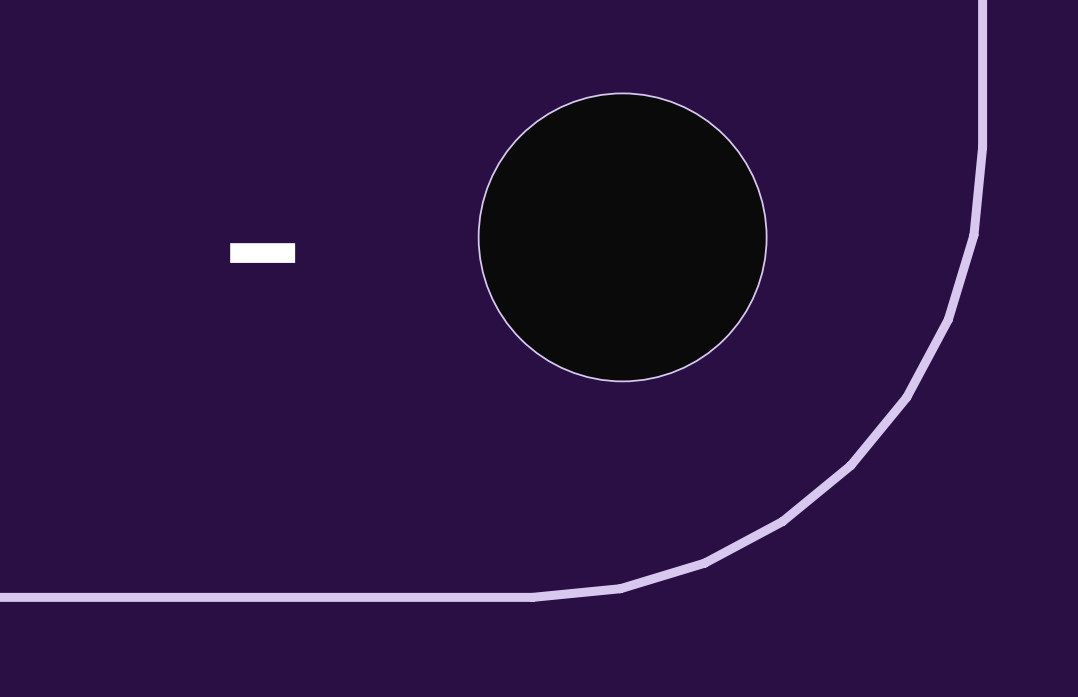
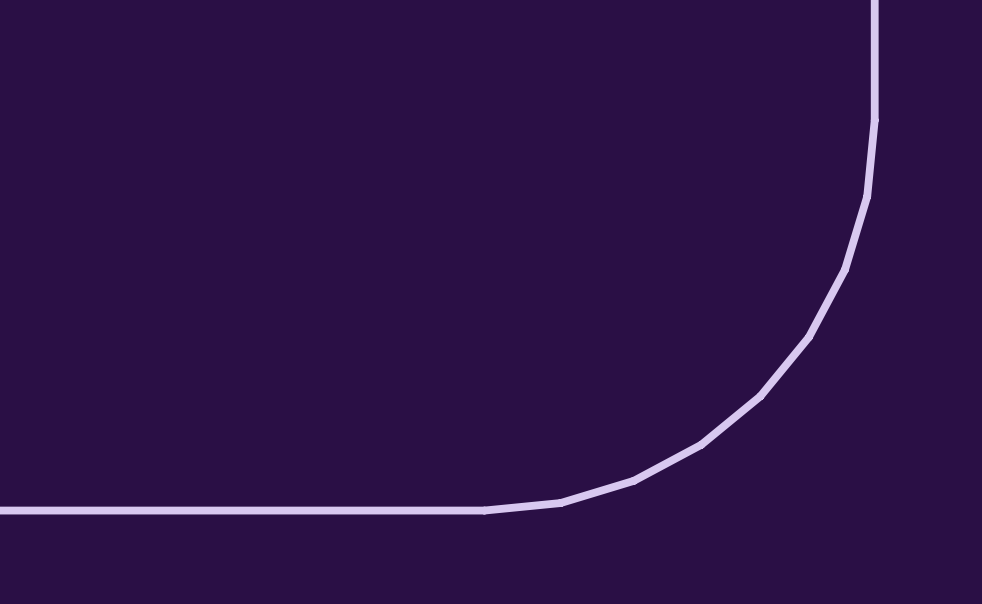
part: (622, 237) -> none
text: - (262, 253) -> none

